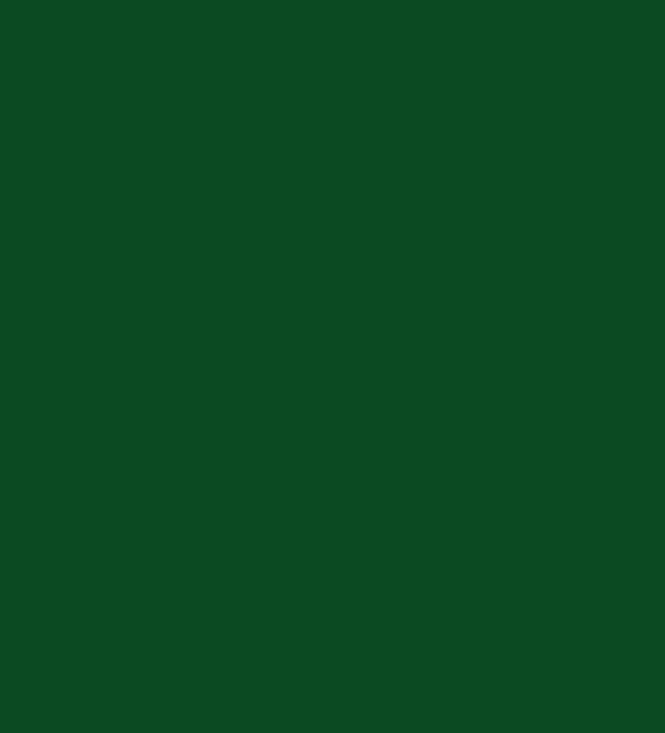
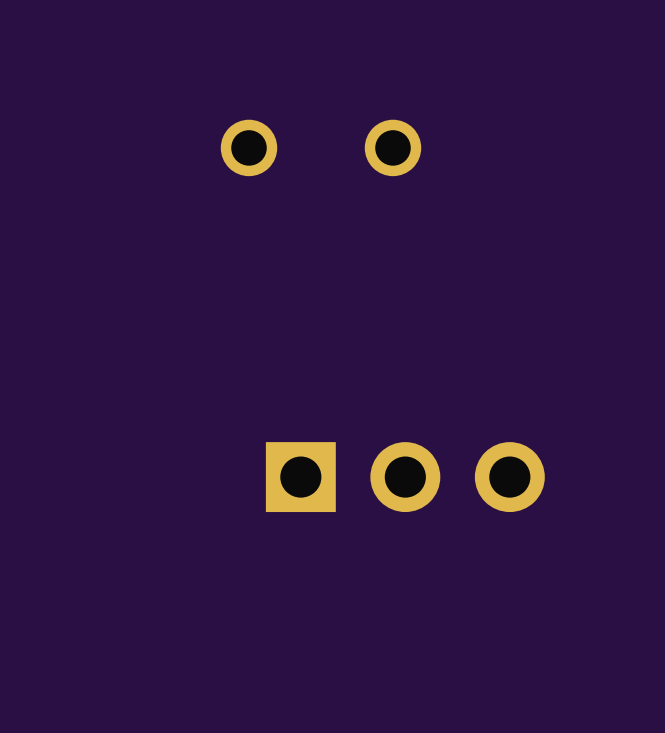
part: none -> (320, 147)
part: none -> (405, 477)

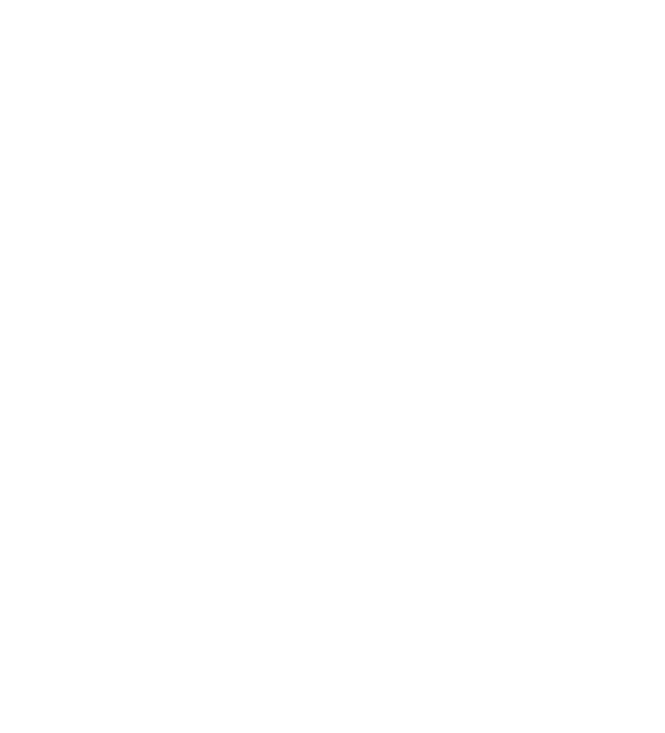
part: (320, 147) -> none
part: (405, 477) -> none

